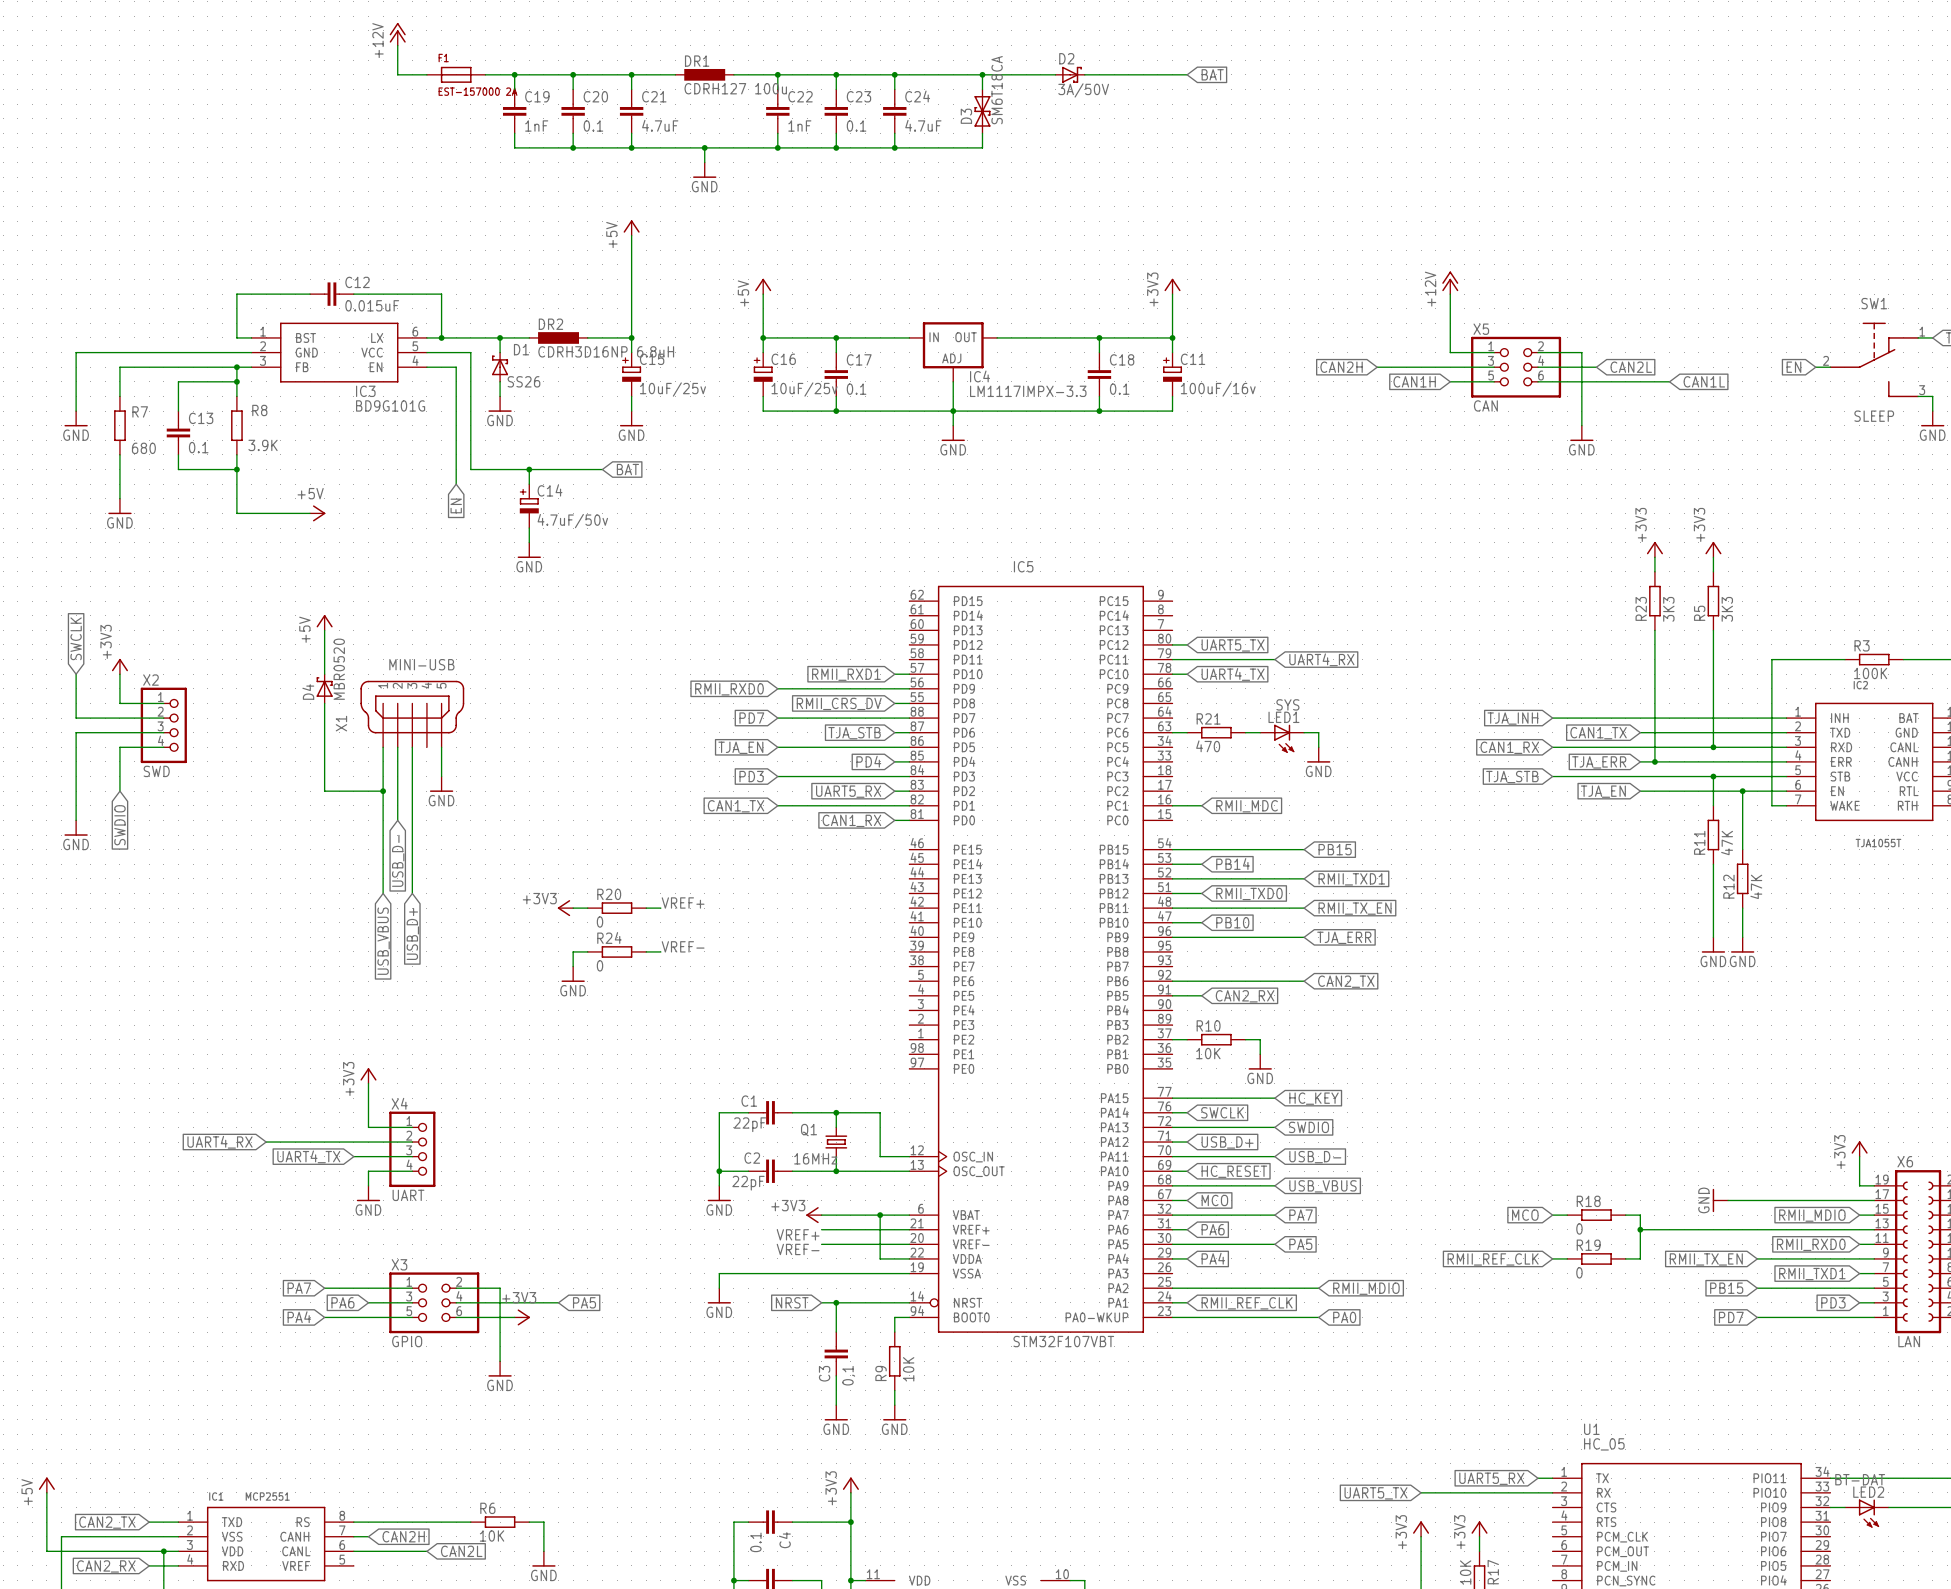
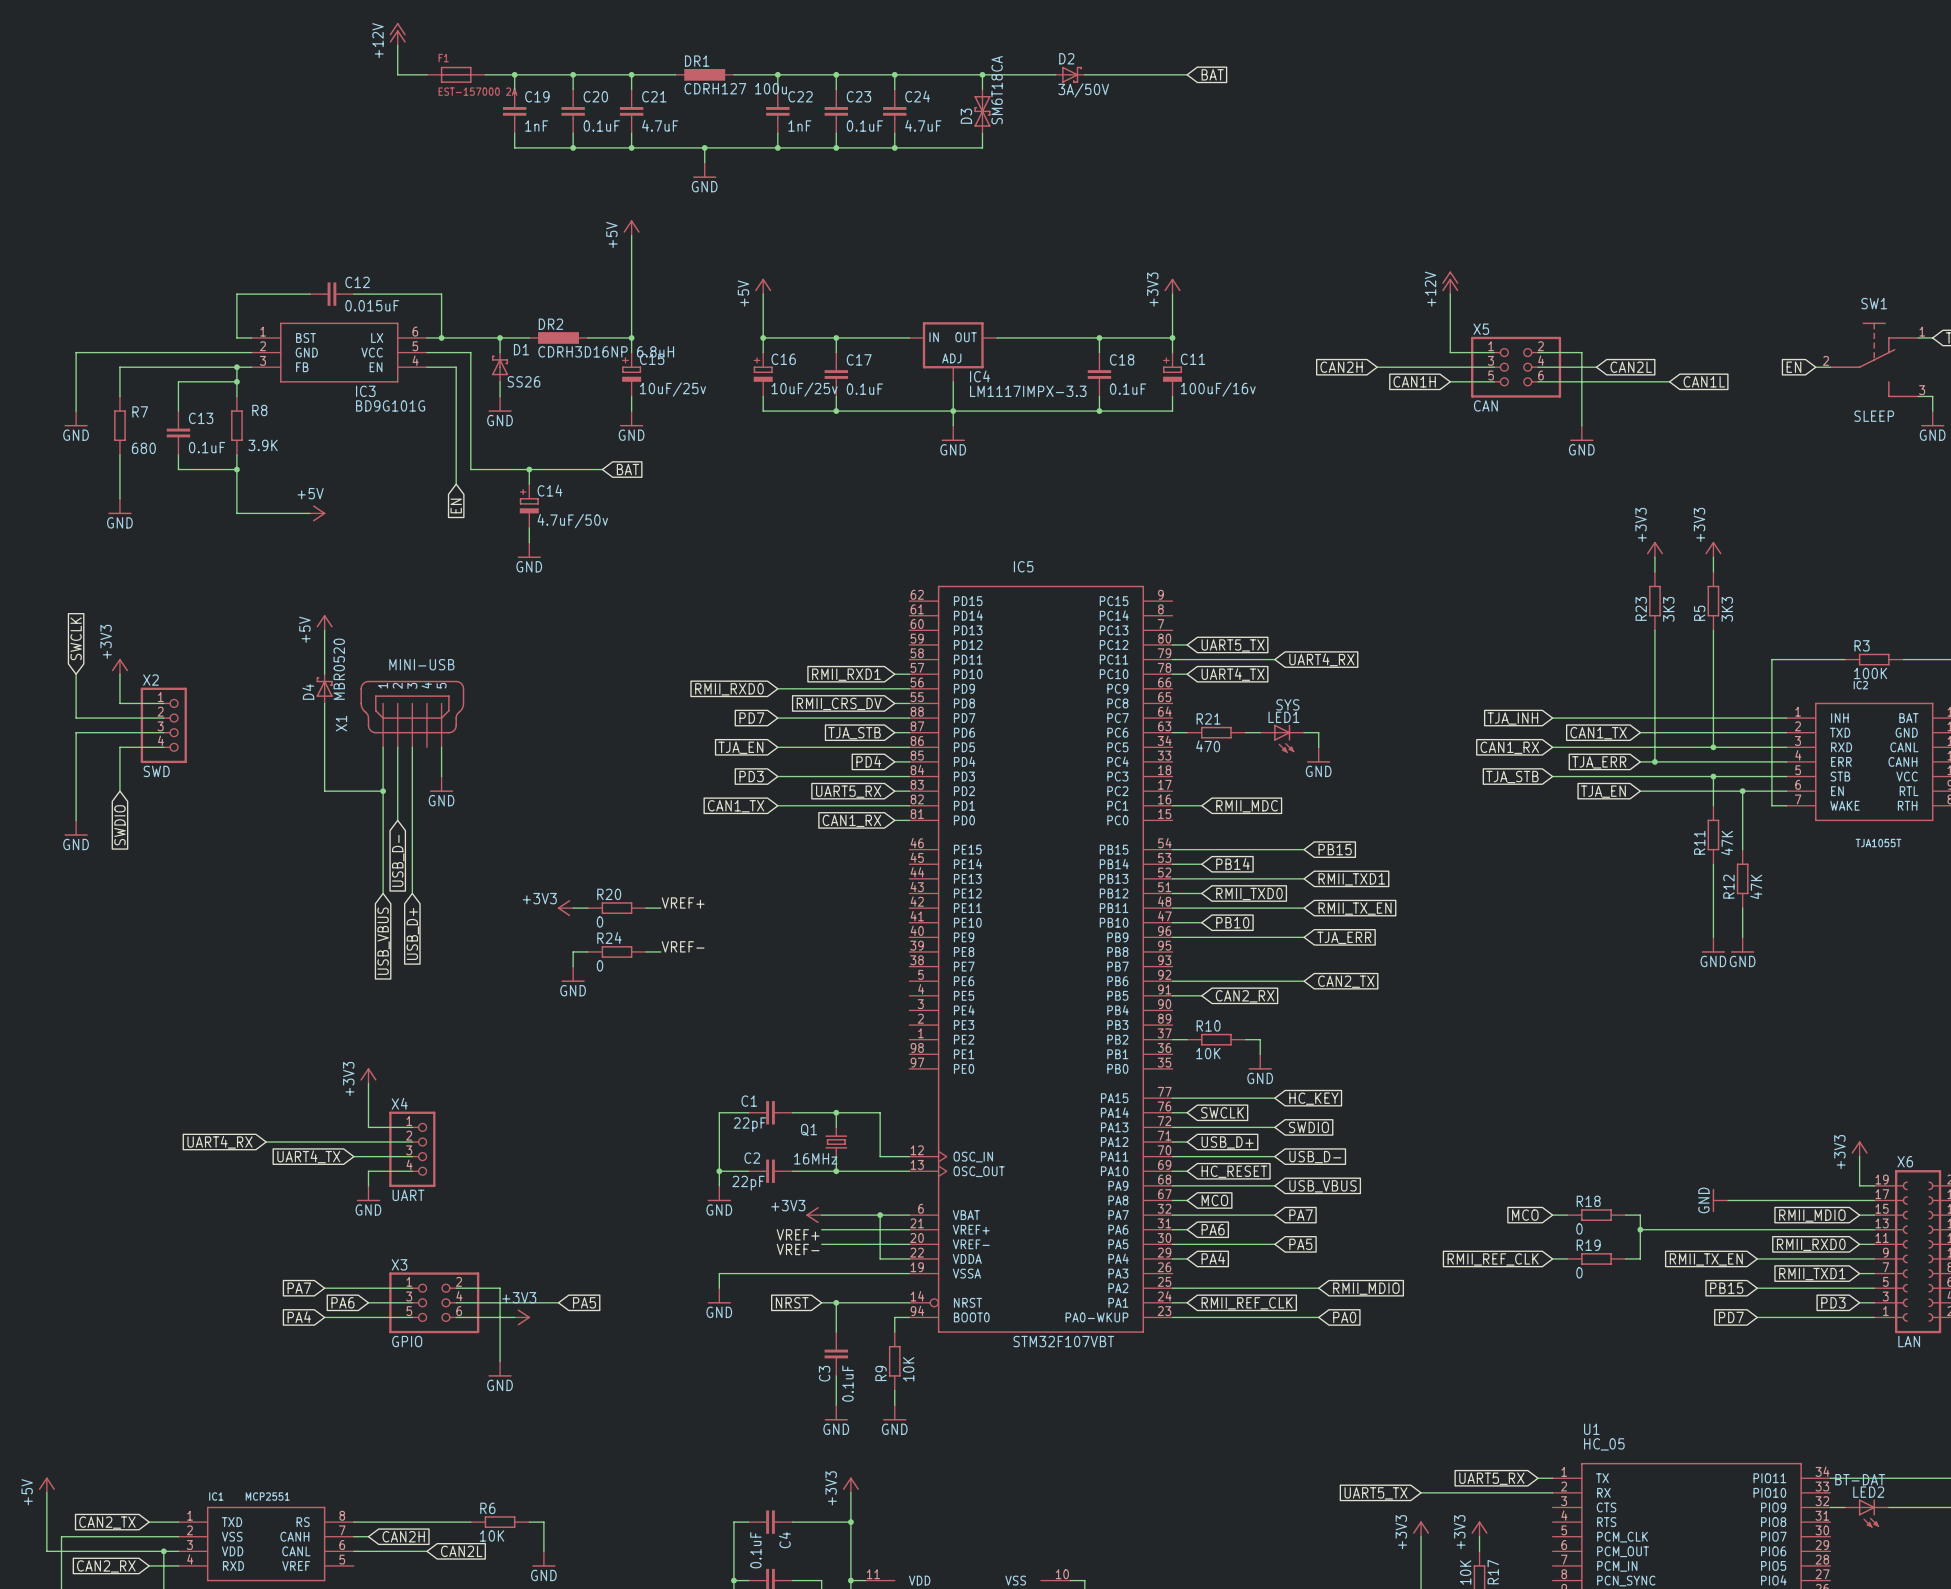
C20 value: 0.1 (593, 126) -> 0.1uF (601, 126)
C23 value: 0.1 (856, 126) -> 0.1uF (864, 126)
C17 value: 0.1 (856, 389) -> 0.1uF (864, 389)
C18 value: 0.1 (1119, 389) -> 0.1uF (1128, 389)
C13 value: 0.1 (198, 447) -> 0.1uF (207, 447)
C3 value: 0,1 (848, 1375) -> 0.1uF (847, 1383)
C4 value: 0.1 (755, 1542) -> 0.1uF (755, 1550)

